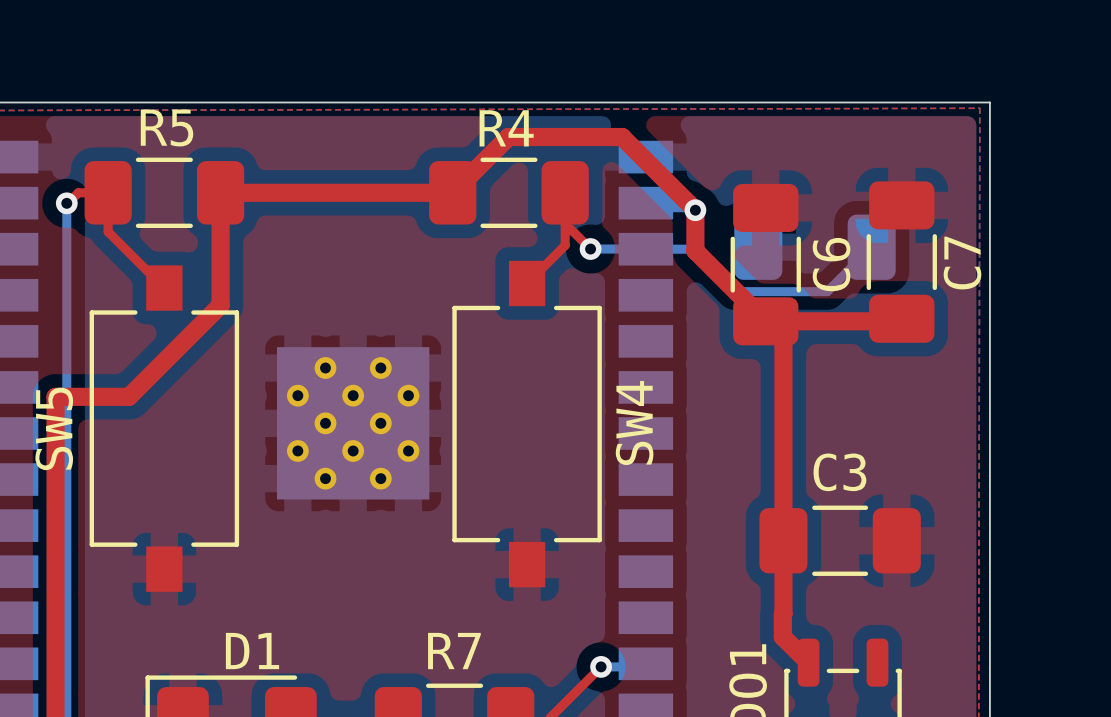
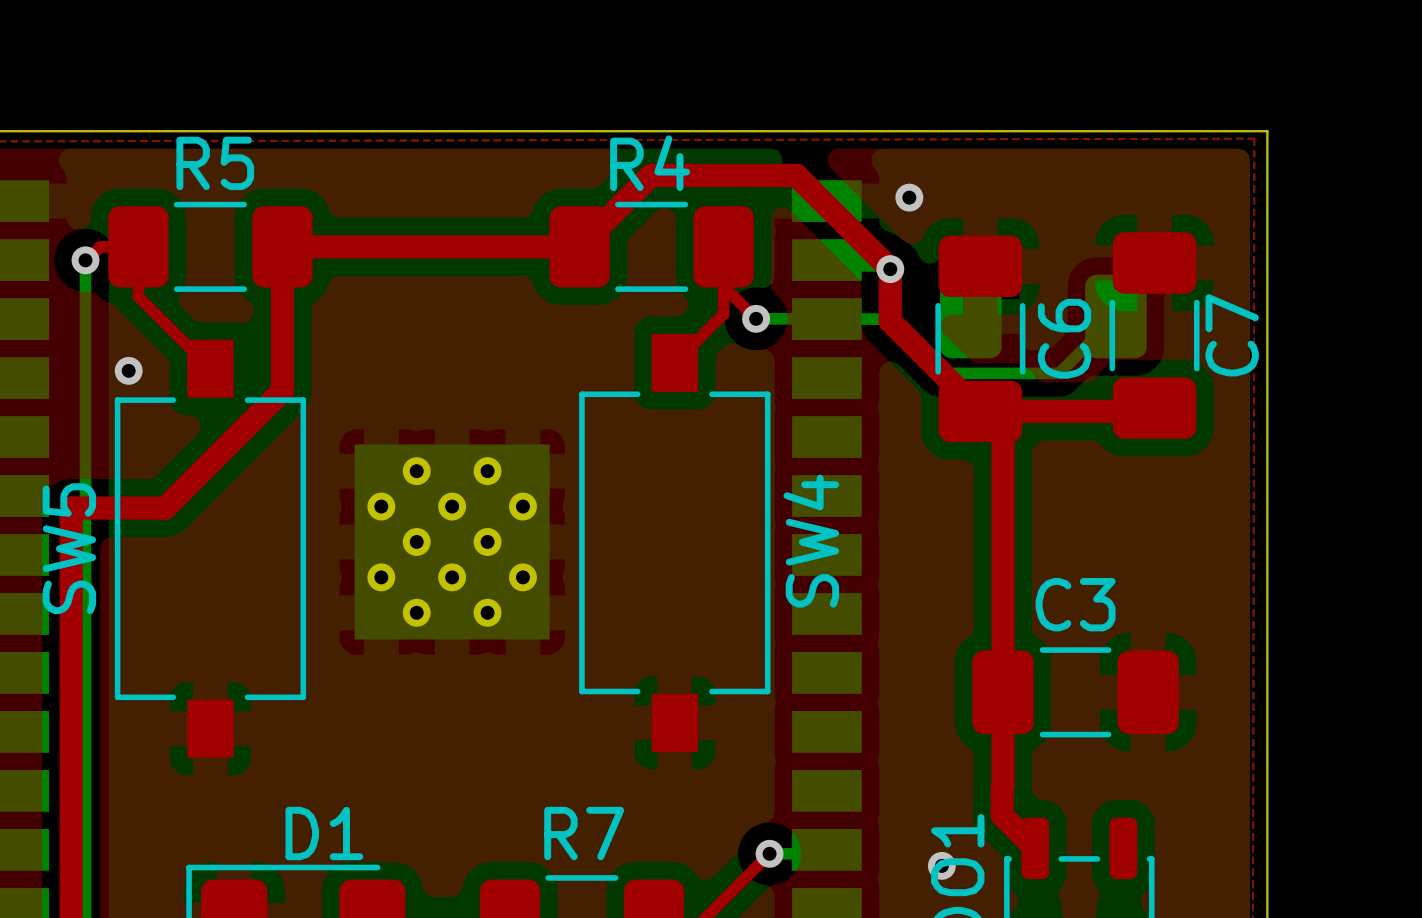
via: none -> (909, 197)
via: none -> (128, 370)
via: none -> (941, 865)

